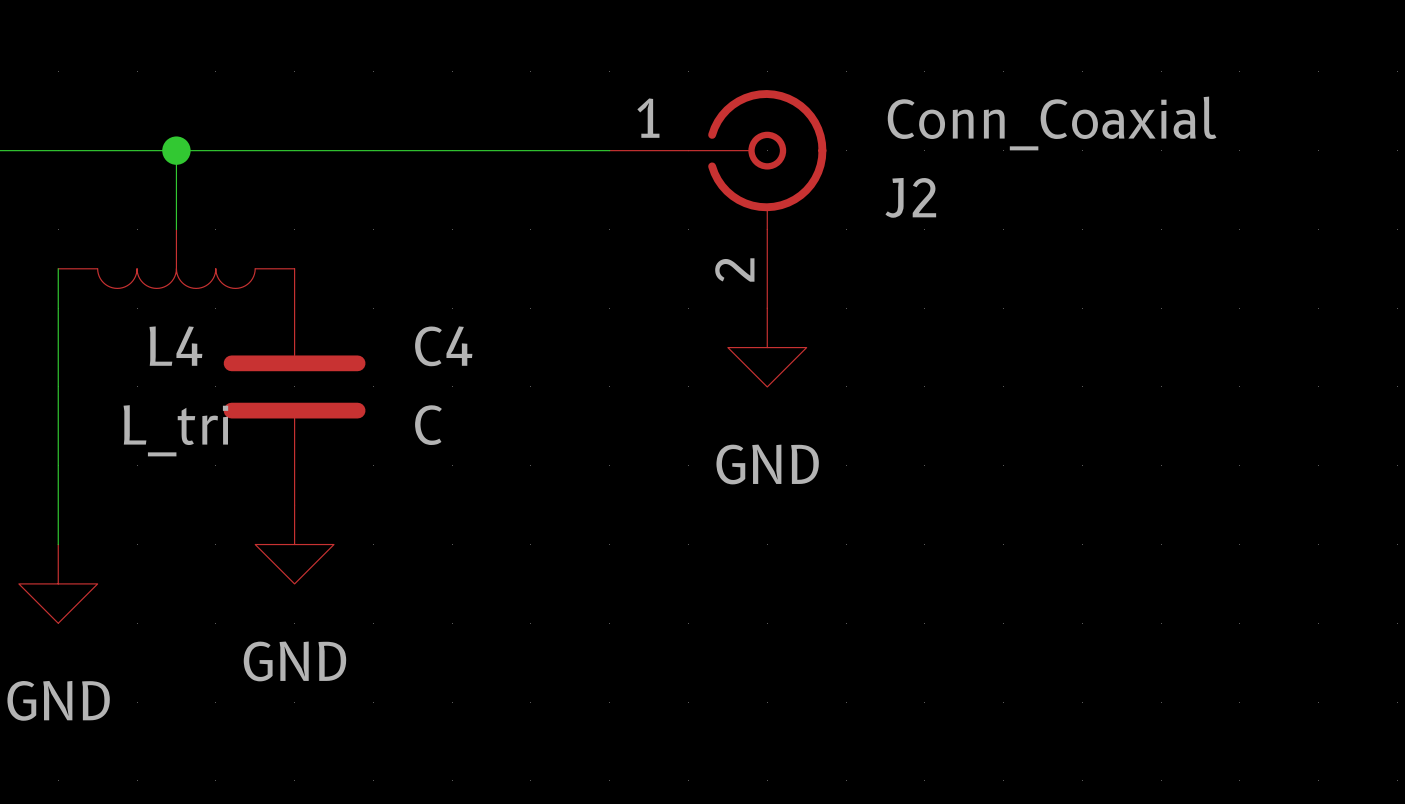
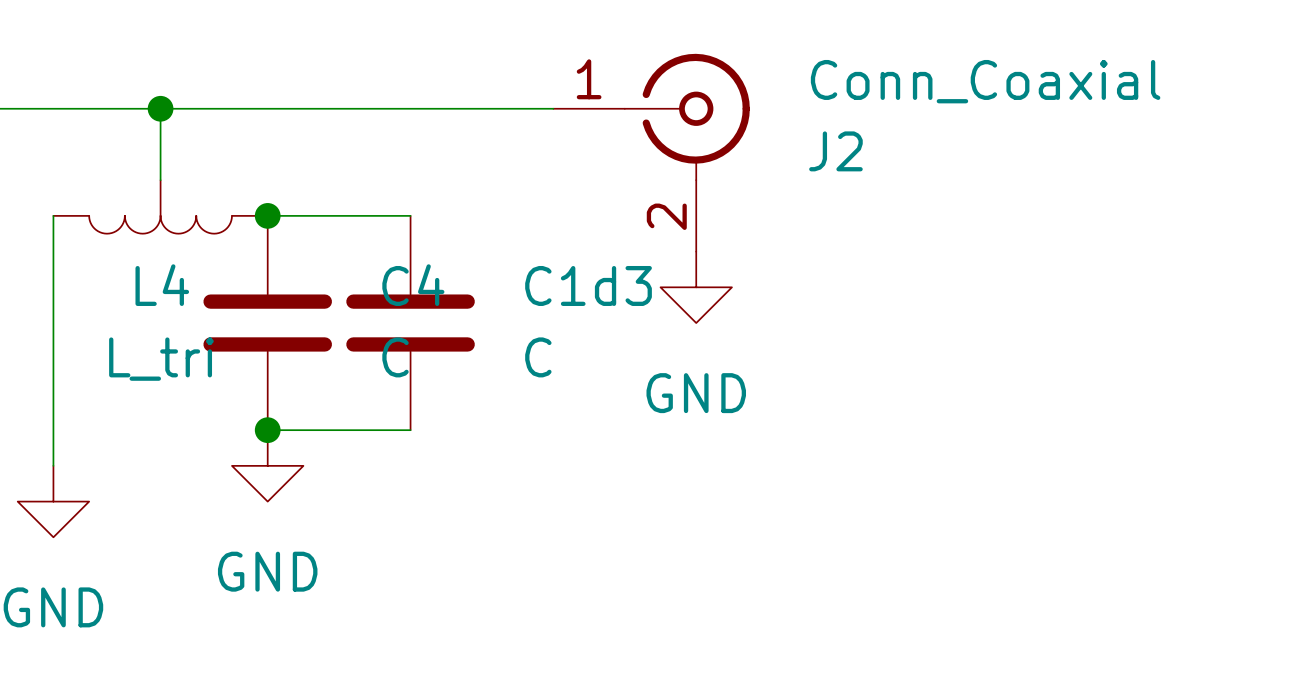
wire: none -> (267, 215) (410, 215)
junction: none -> (267, 215)
C1d3: none -> C (410, 323)
wire: none -> (267, 430) (410, 430)
junction: none -> (267, 430)

